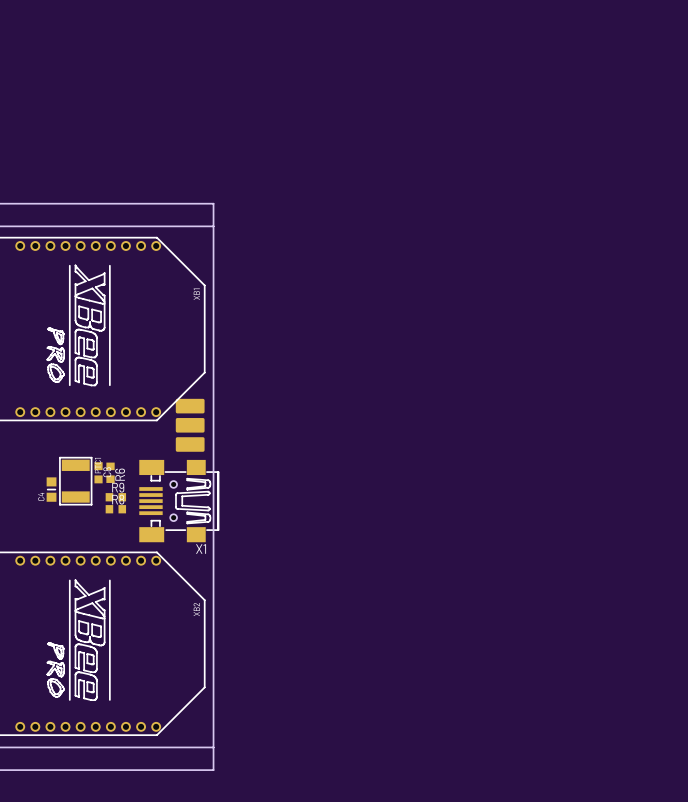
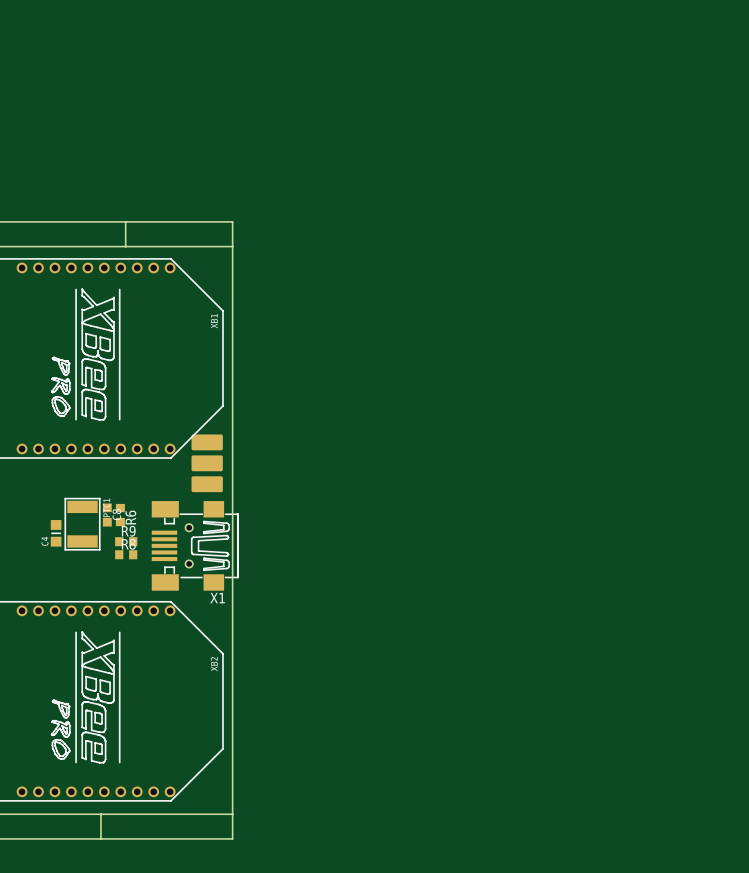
board edge: none -> (125, 221) (125, 246)
board edge: none -> (100, 814) (100, 838)

